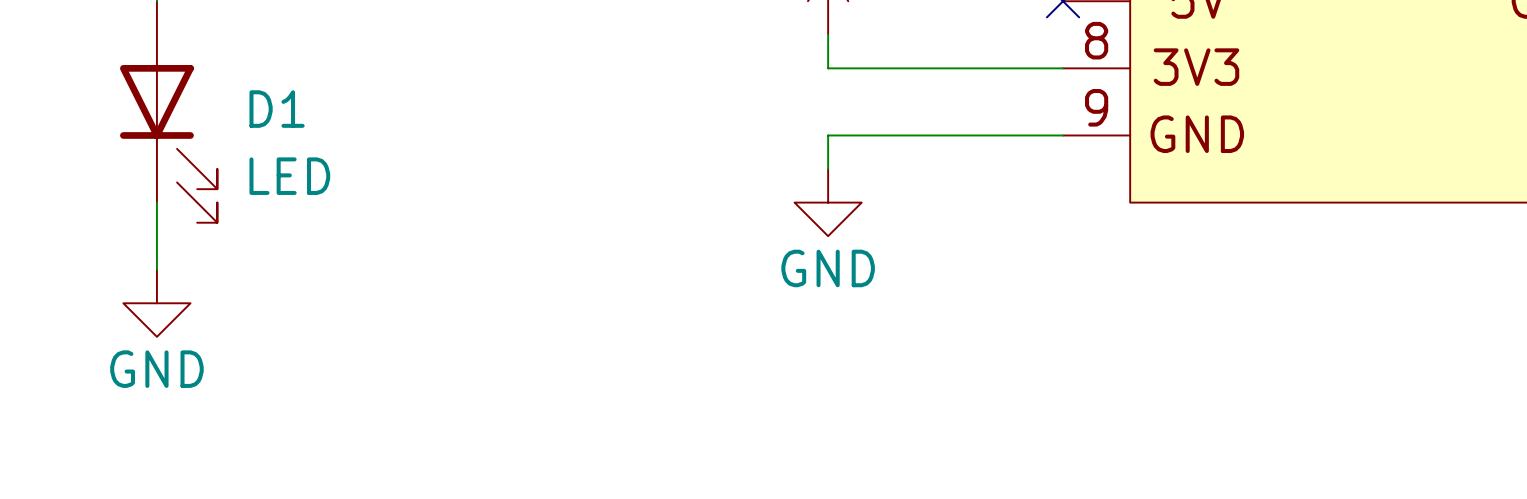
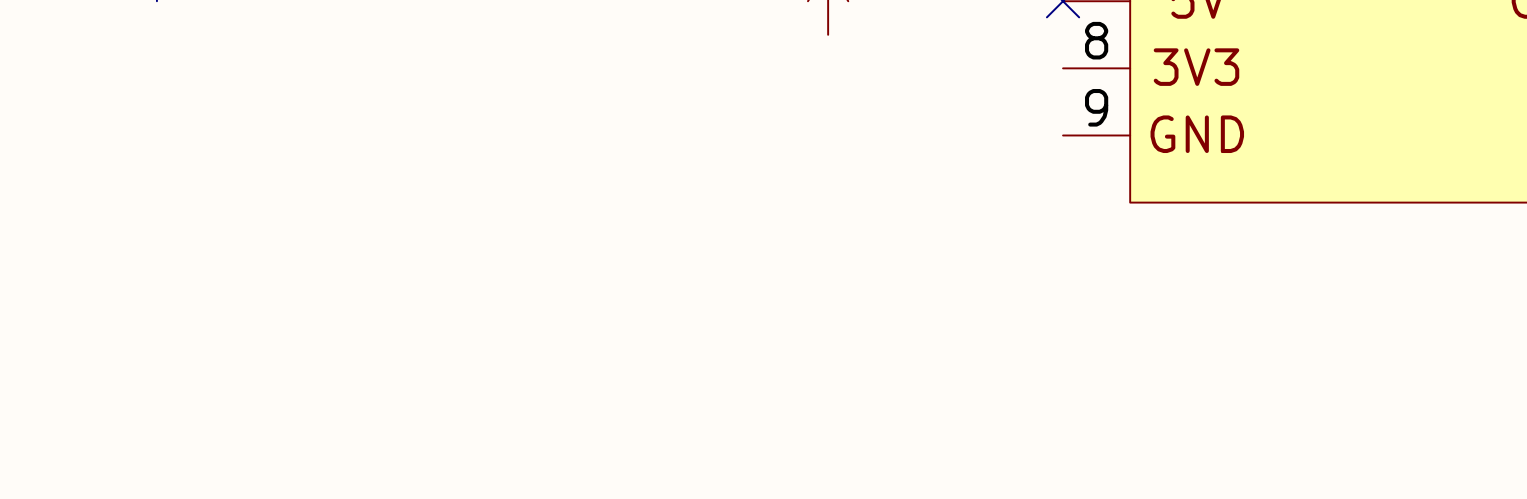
wire: (828, 34) (828, 68) (1063, 68) -> none
D1: LED (168, 111) -> none
wire: (1063, 135) (828, 135) (828, 169) -> none
wire: (156, 202) (156, 269) -> none
power symbol: GND (828, 202) -> none
power symbol: GND (156, 303) -> none

